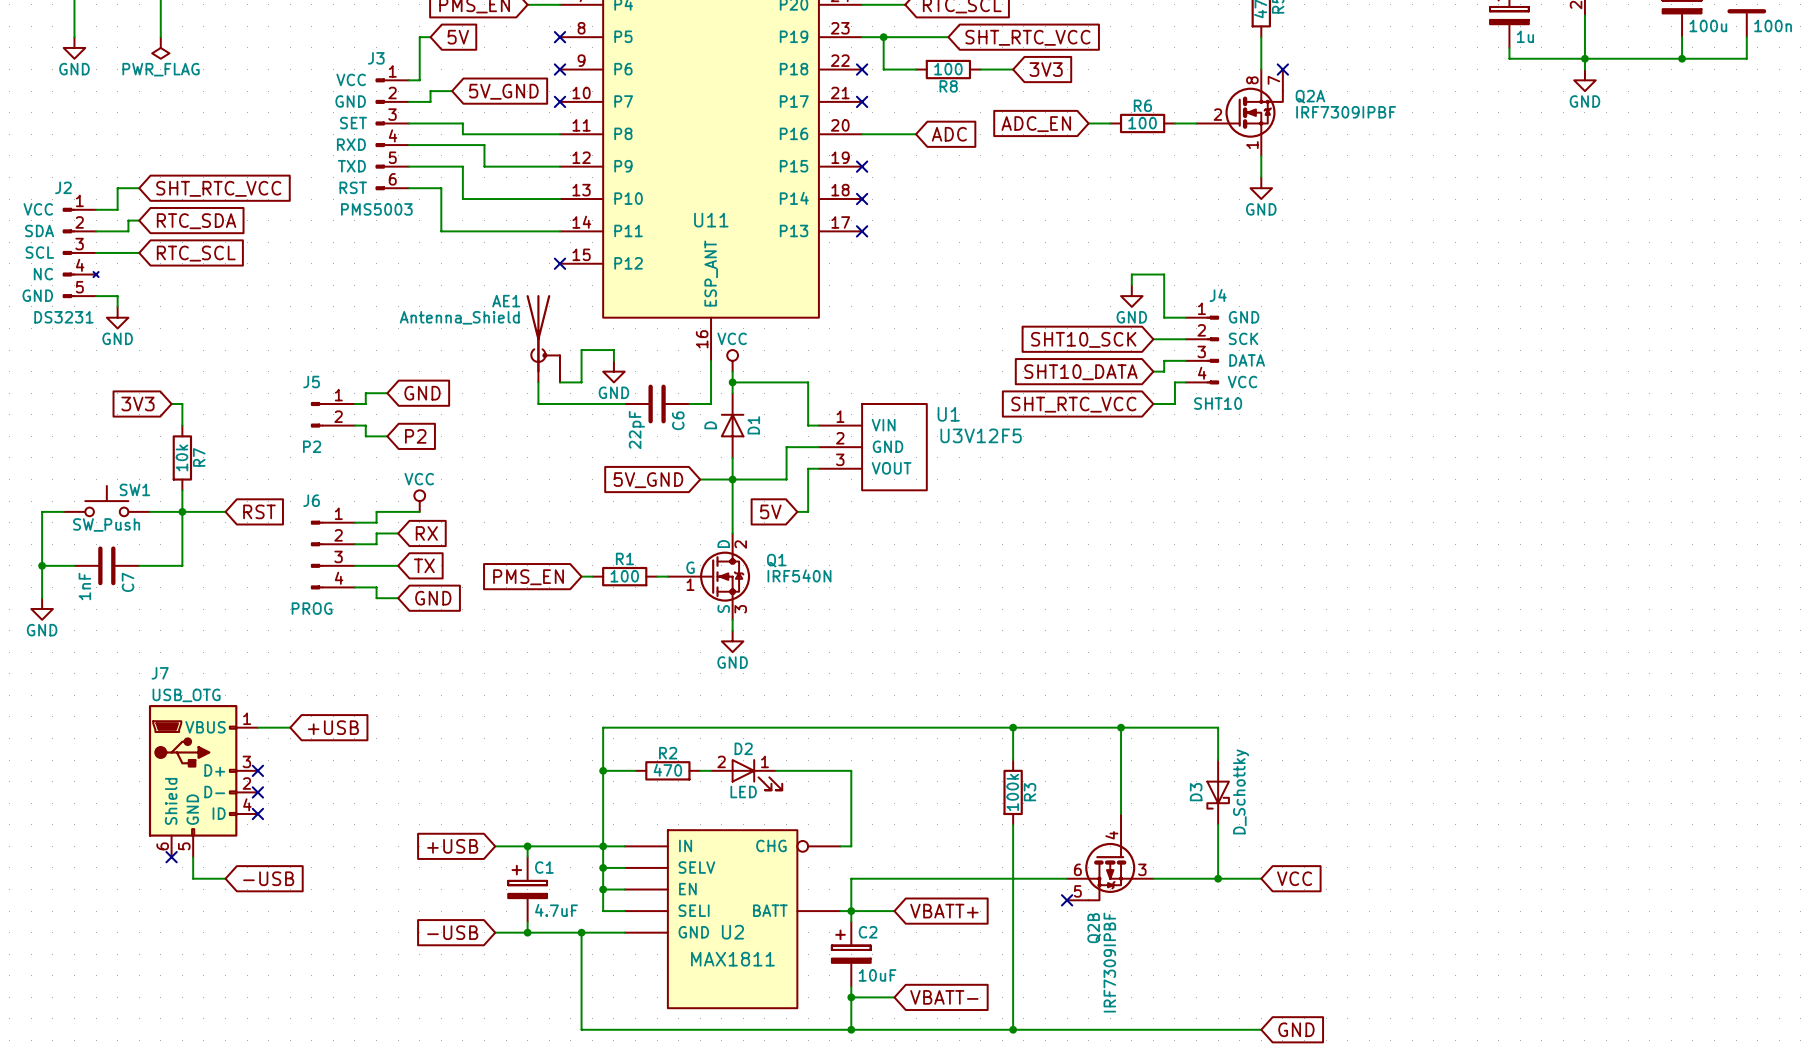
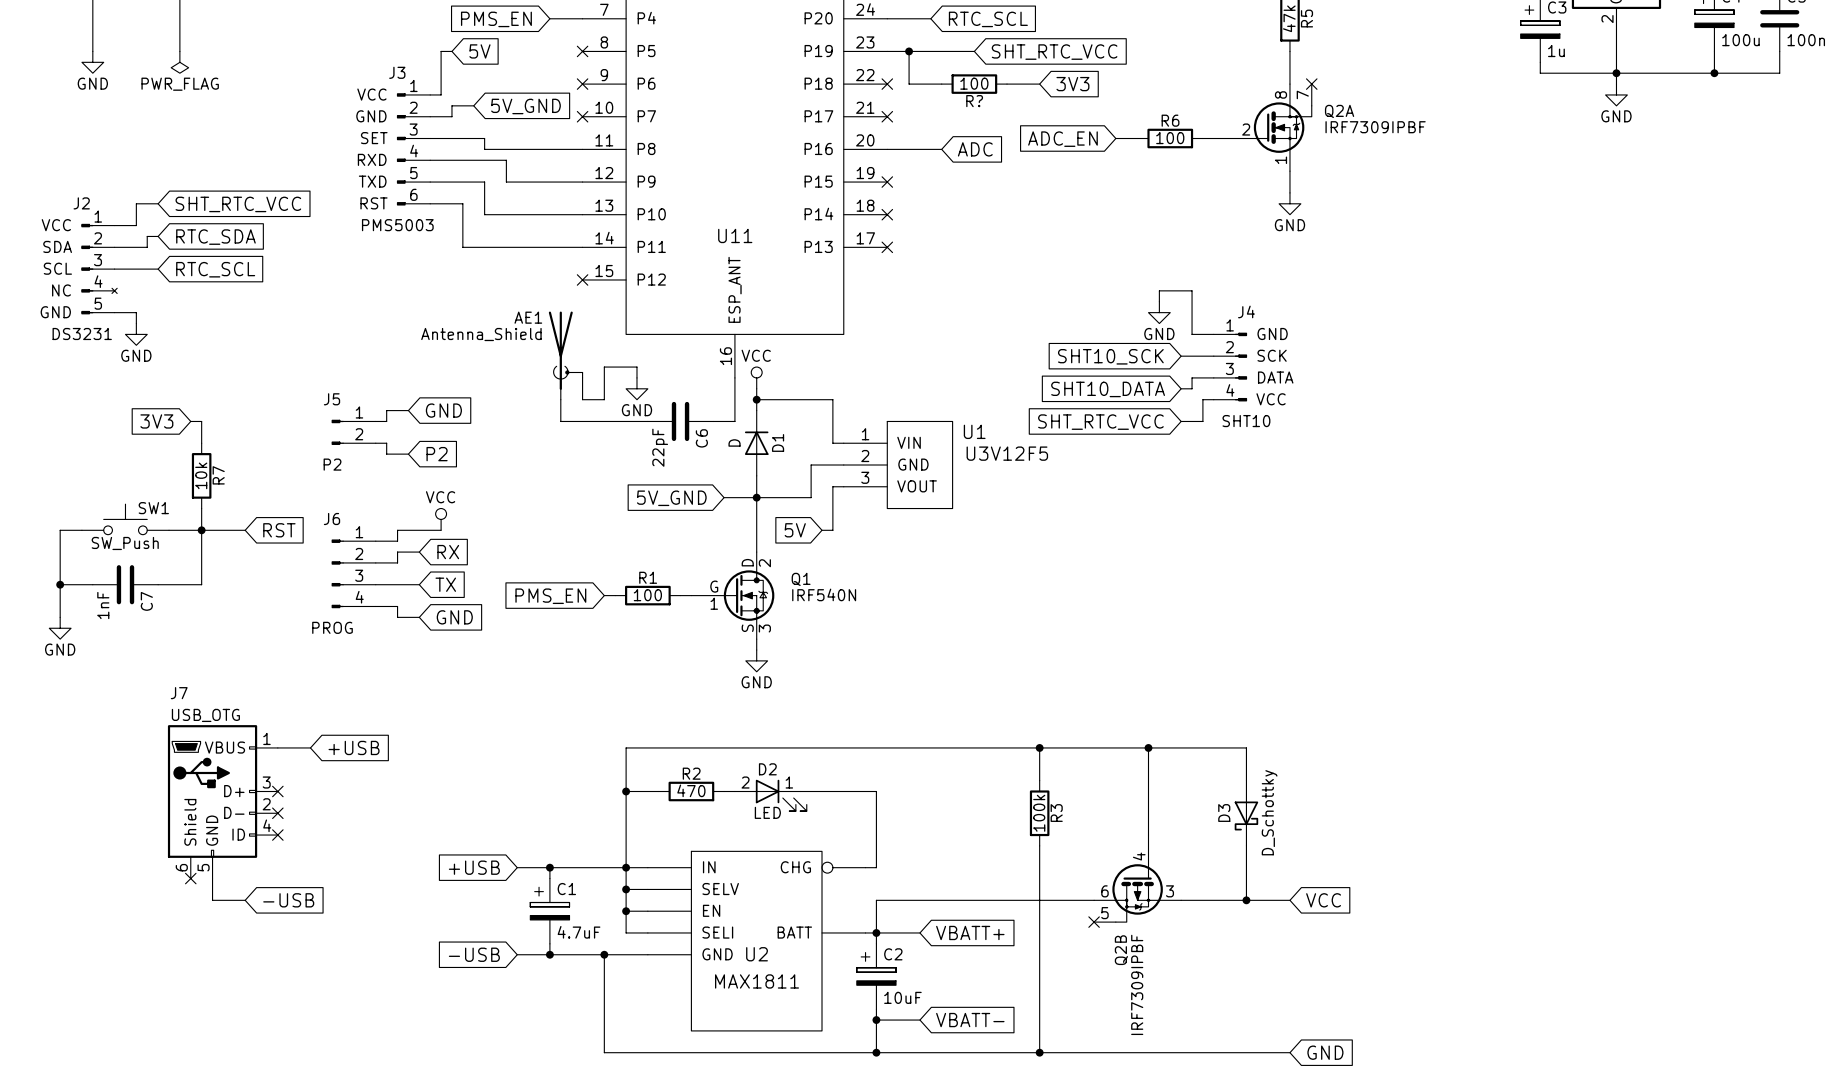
R8 name: R8 (948, 86) -> R? (974, 101)

